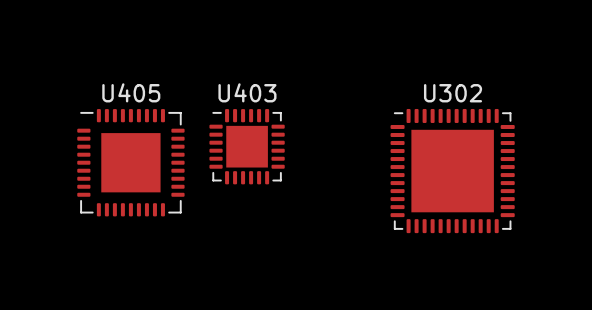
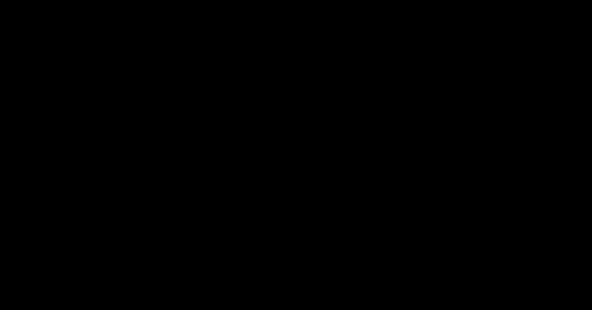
U403: (247, 146) -> none
U405: (130, 162) -> none
U302: (452, 171) -> none

